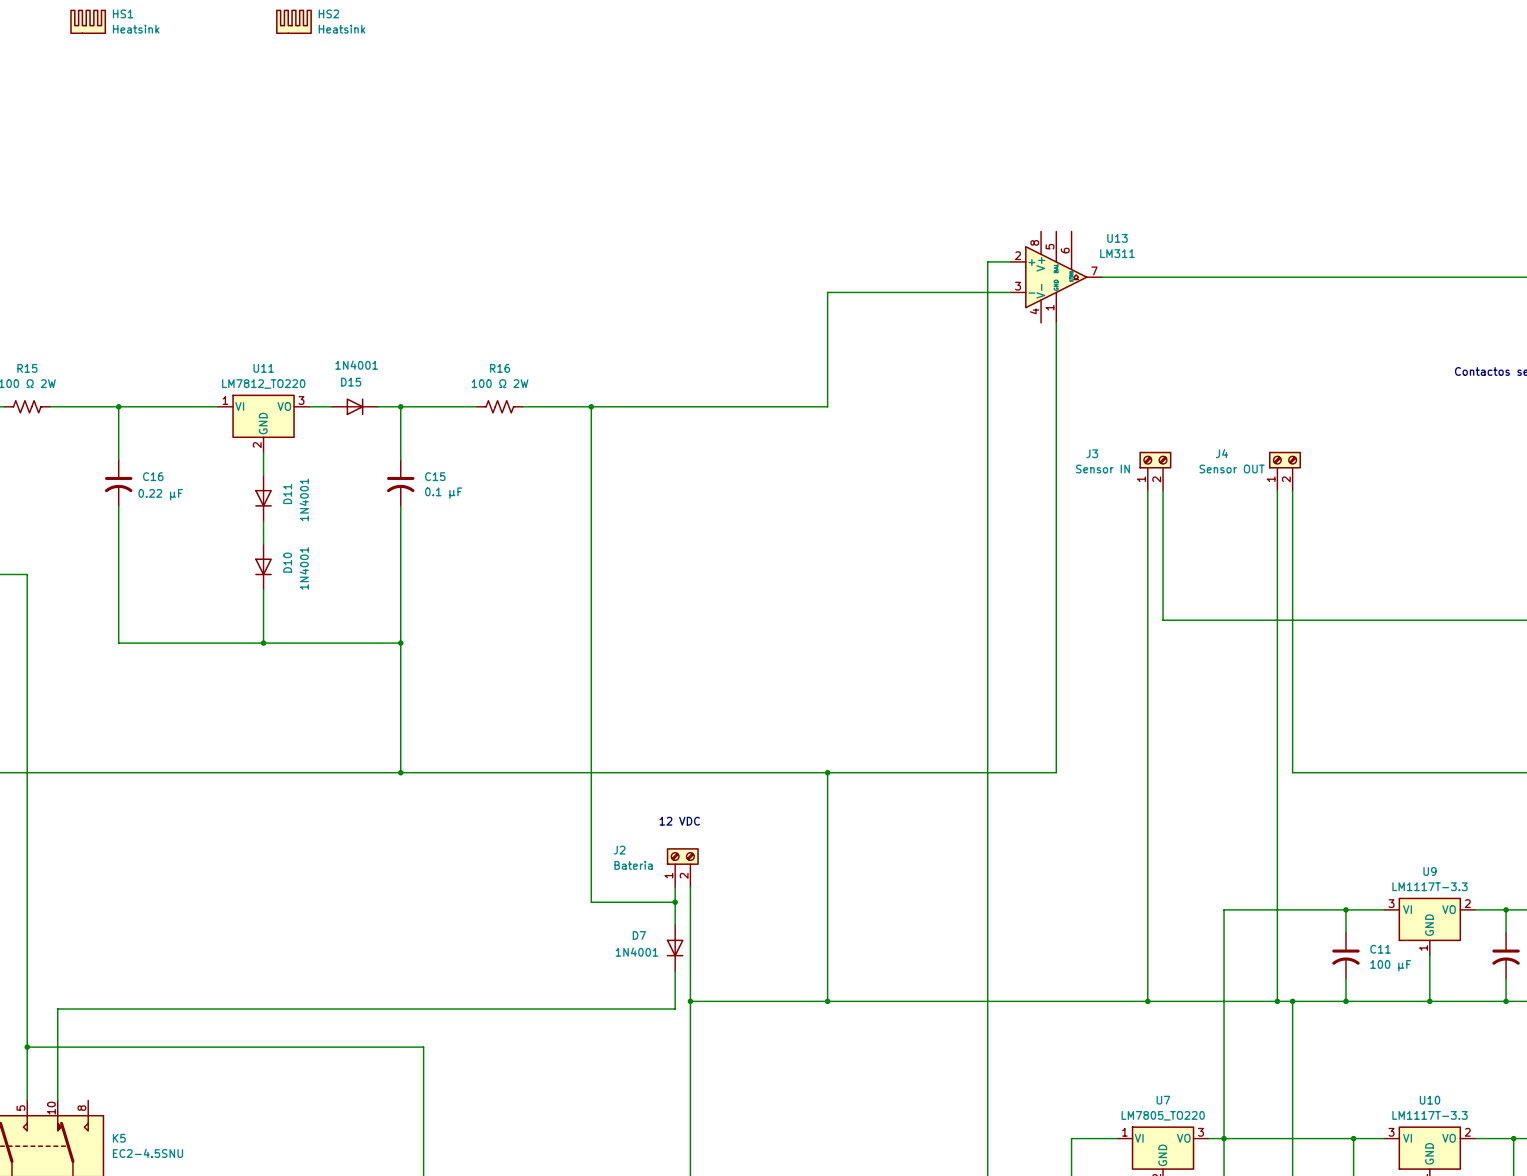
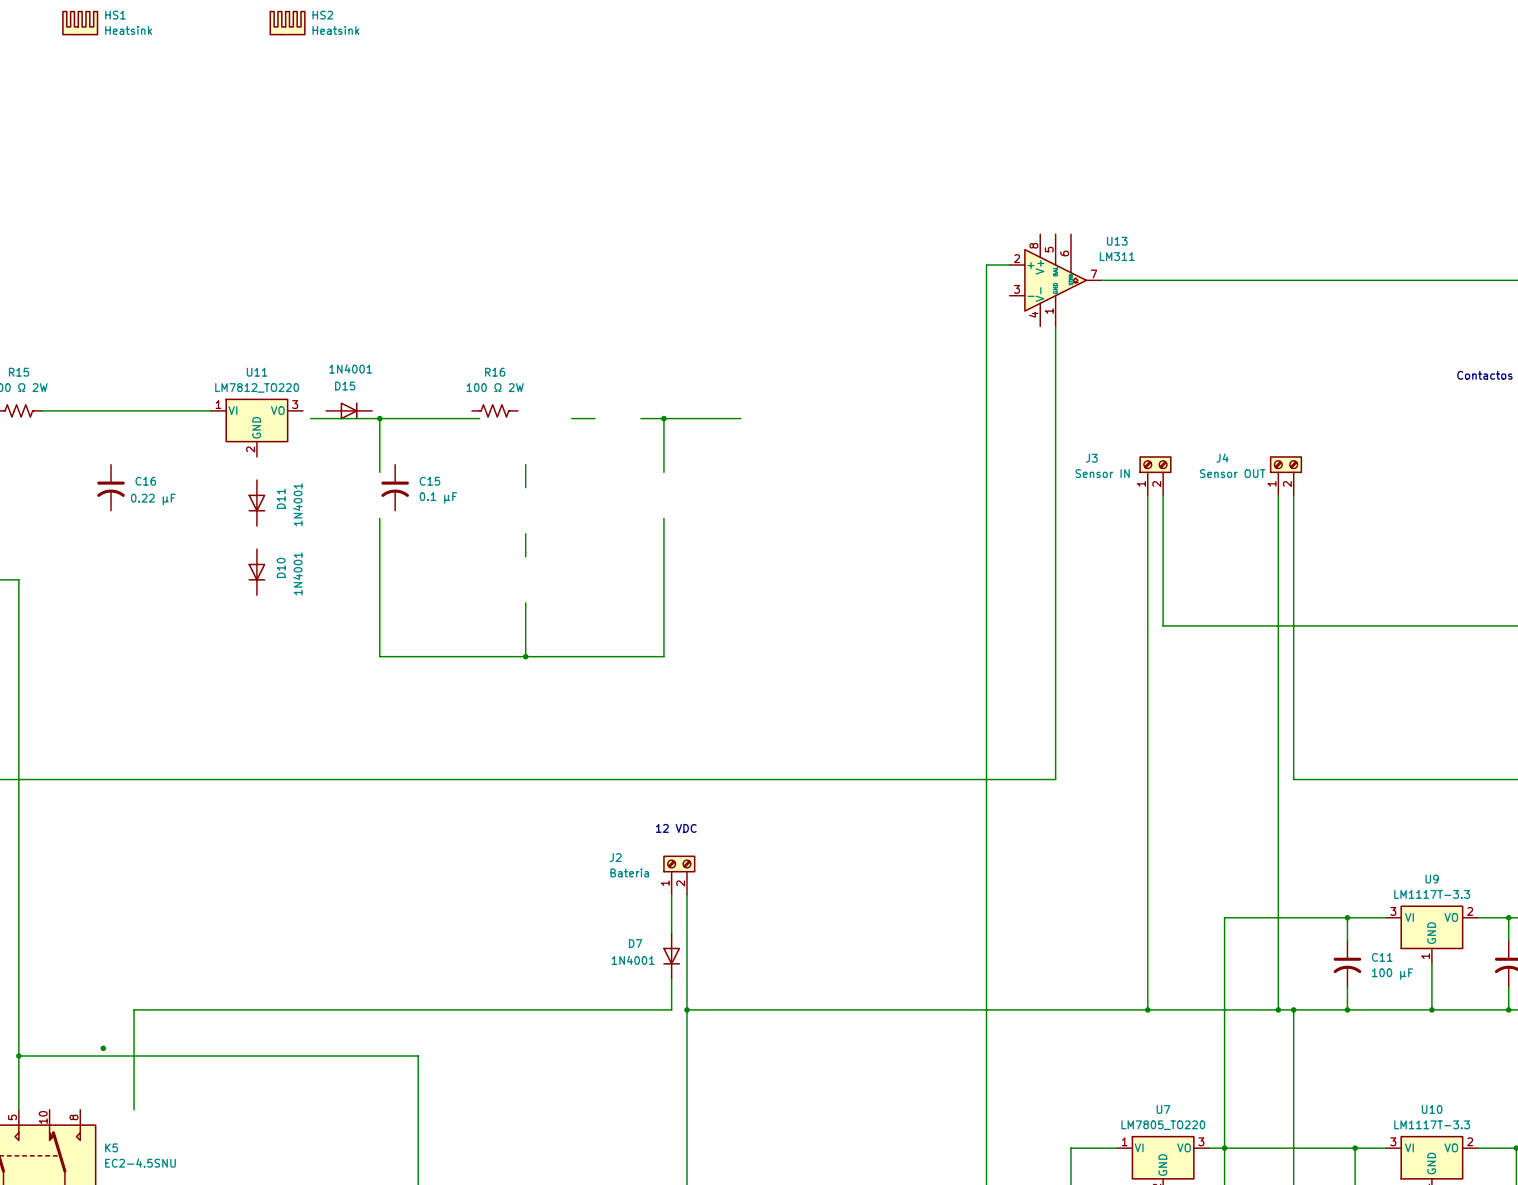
wire: (1010, 292) (827, 292) (827, 406) (522, 406) -> none
wire: (118, 406) (118, 460) -> none
junction: (118, 406) -> none
wire: (309, 406) (332, 406) -> none
wire: (377, 406) (476, 406) -> none
wire: (400, 406) (400, 460) -> (379, 418) (379, 472)
junction position: (400, 406) -> (379, 418)
wire: (591, 406) (591, 902) (675, 902) -> none
junction: (591, 406) -> none
wire: none -> (310, 418) (479, 418)
wire: none -> (571, 418) (594, 418)
wire: none -> (640, 418) (740, 418)
wire: none -> (663, 418) (663, 472)
junction: none -> (663, 418)
wire: (263, 452) (263, 475) -> none
wire: none -> (525, 464) (525, 487)
wire: (118, 505) (118, 643) (400, 643) -> none
wire: (400, 505) (400, 772) -> none
wire: none -> (379, 518) (379, 656) (663, 656) (663, 518)
wire: (263, 521) (263, 544) -> none
wire: none -> (525, 533) (525, 556)
wire: (263, 589) (263, 643) -> none
wire: none -> (525, 602) (525, 656)
junction: (263, 643) -> none
junction: (400, 643) -> none
junction: none -> (525, 656)
junction: (400, 772) -> none
wire: (827, 772) (827, 1001) -> none
junction: (827, 772) -> none
junction: (675, 902) -> none
wire: (675, 1001) (675, 1008) (57, 1008) (57, 1100) -> (671, 1009) (134, 1009) (134, 1109)
junction: (827, 1001) -> none
junction: none -> (103, 1048)

